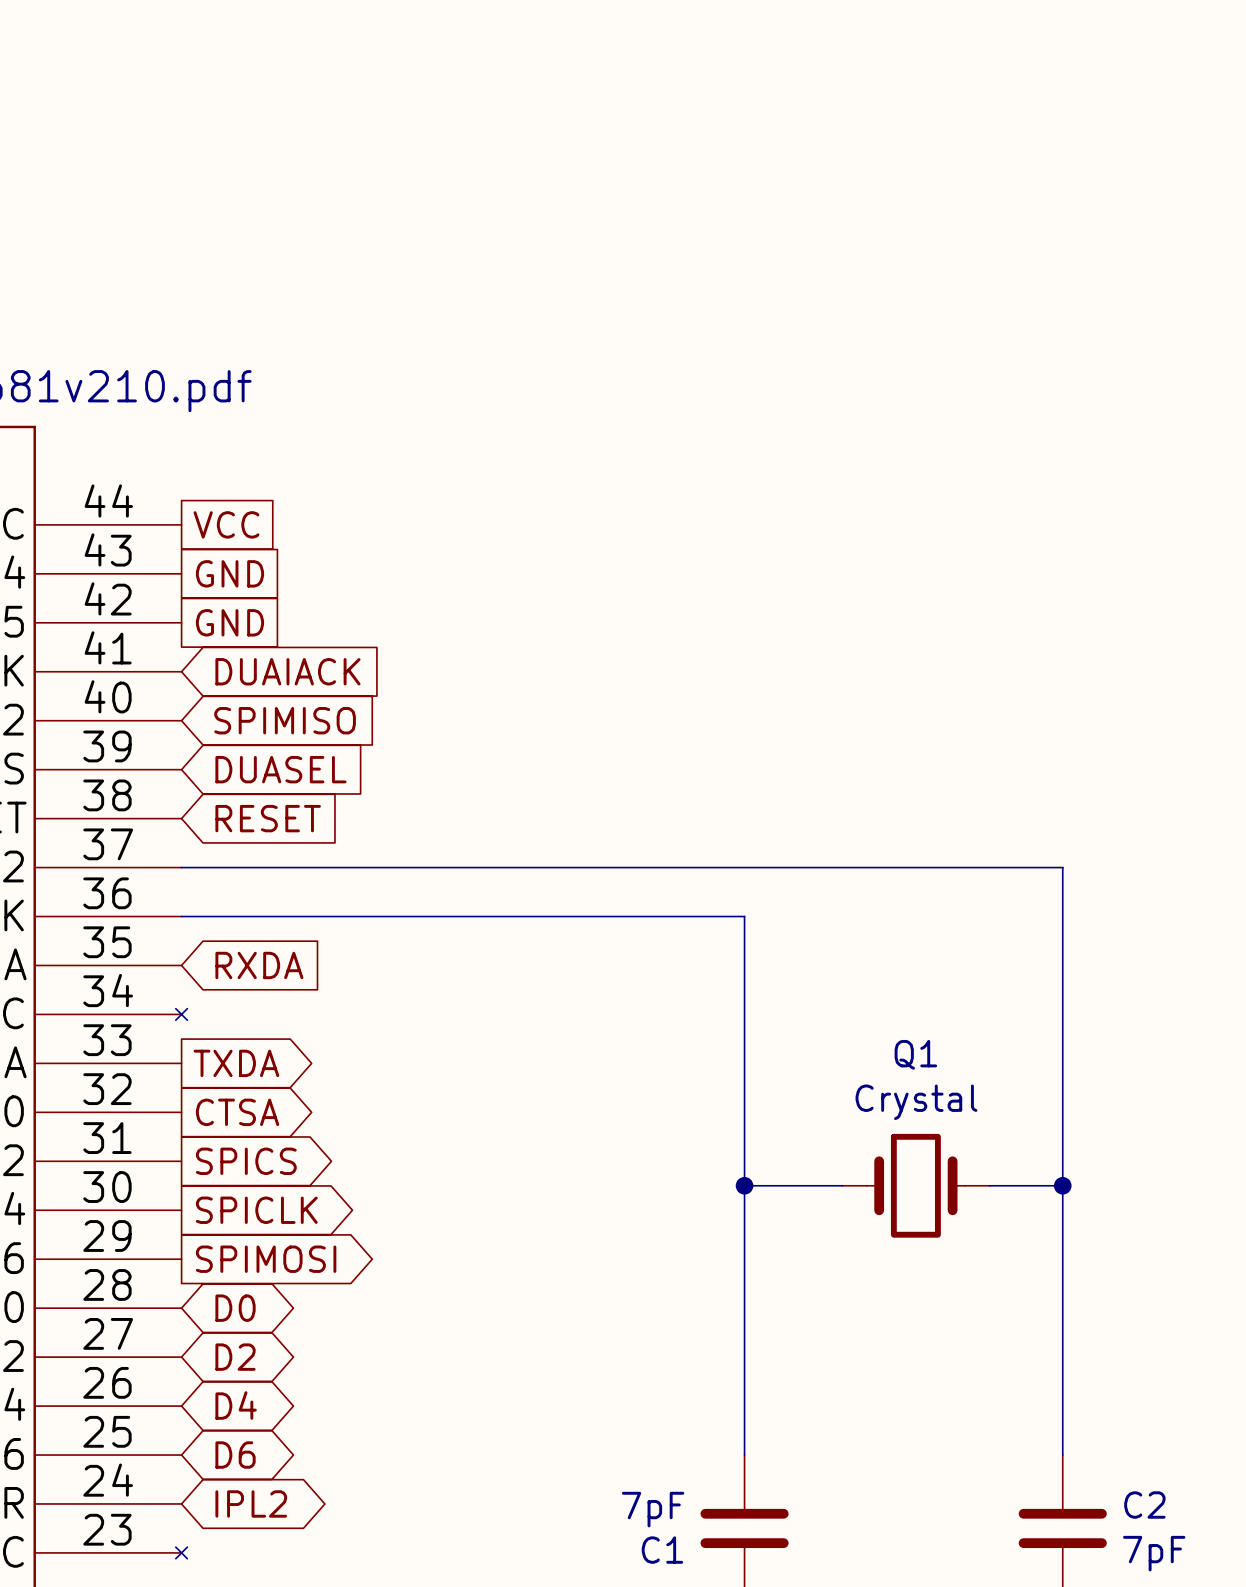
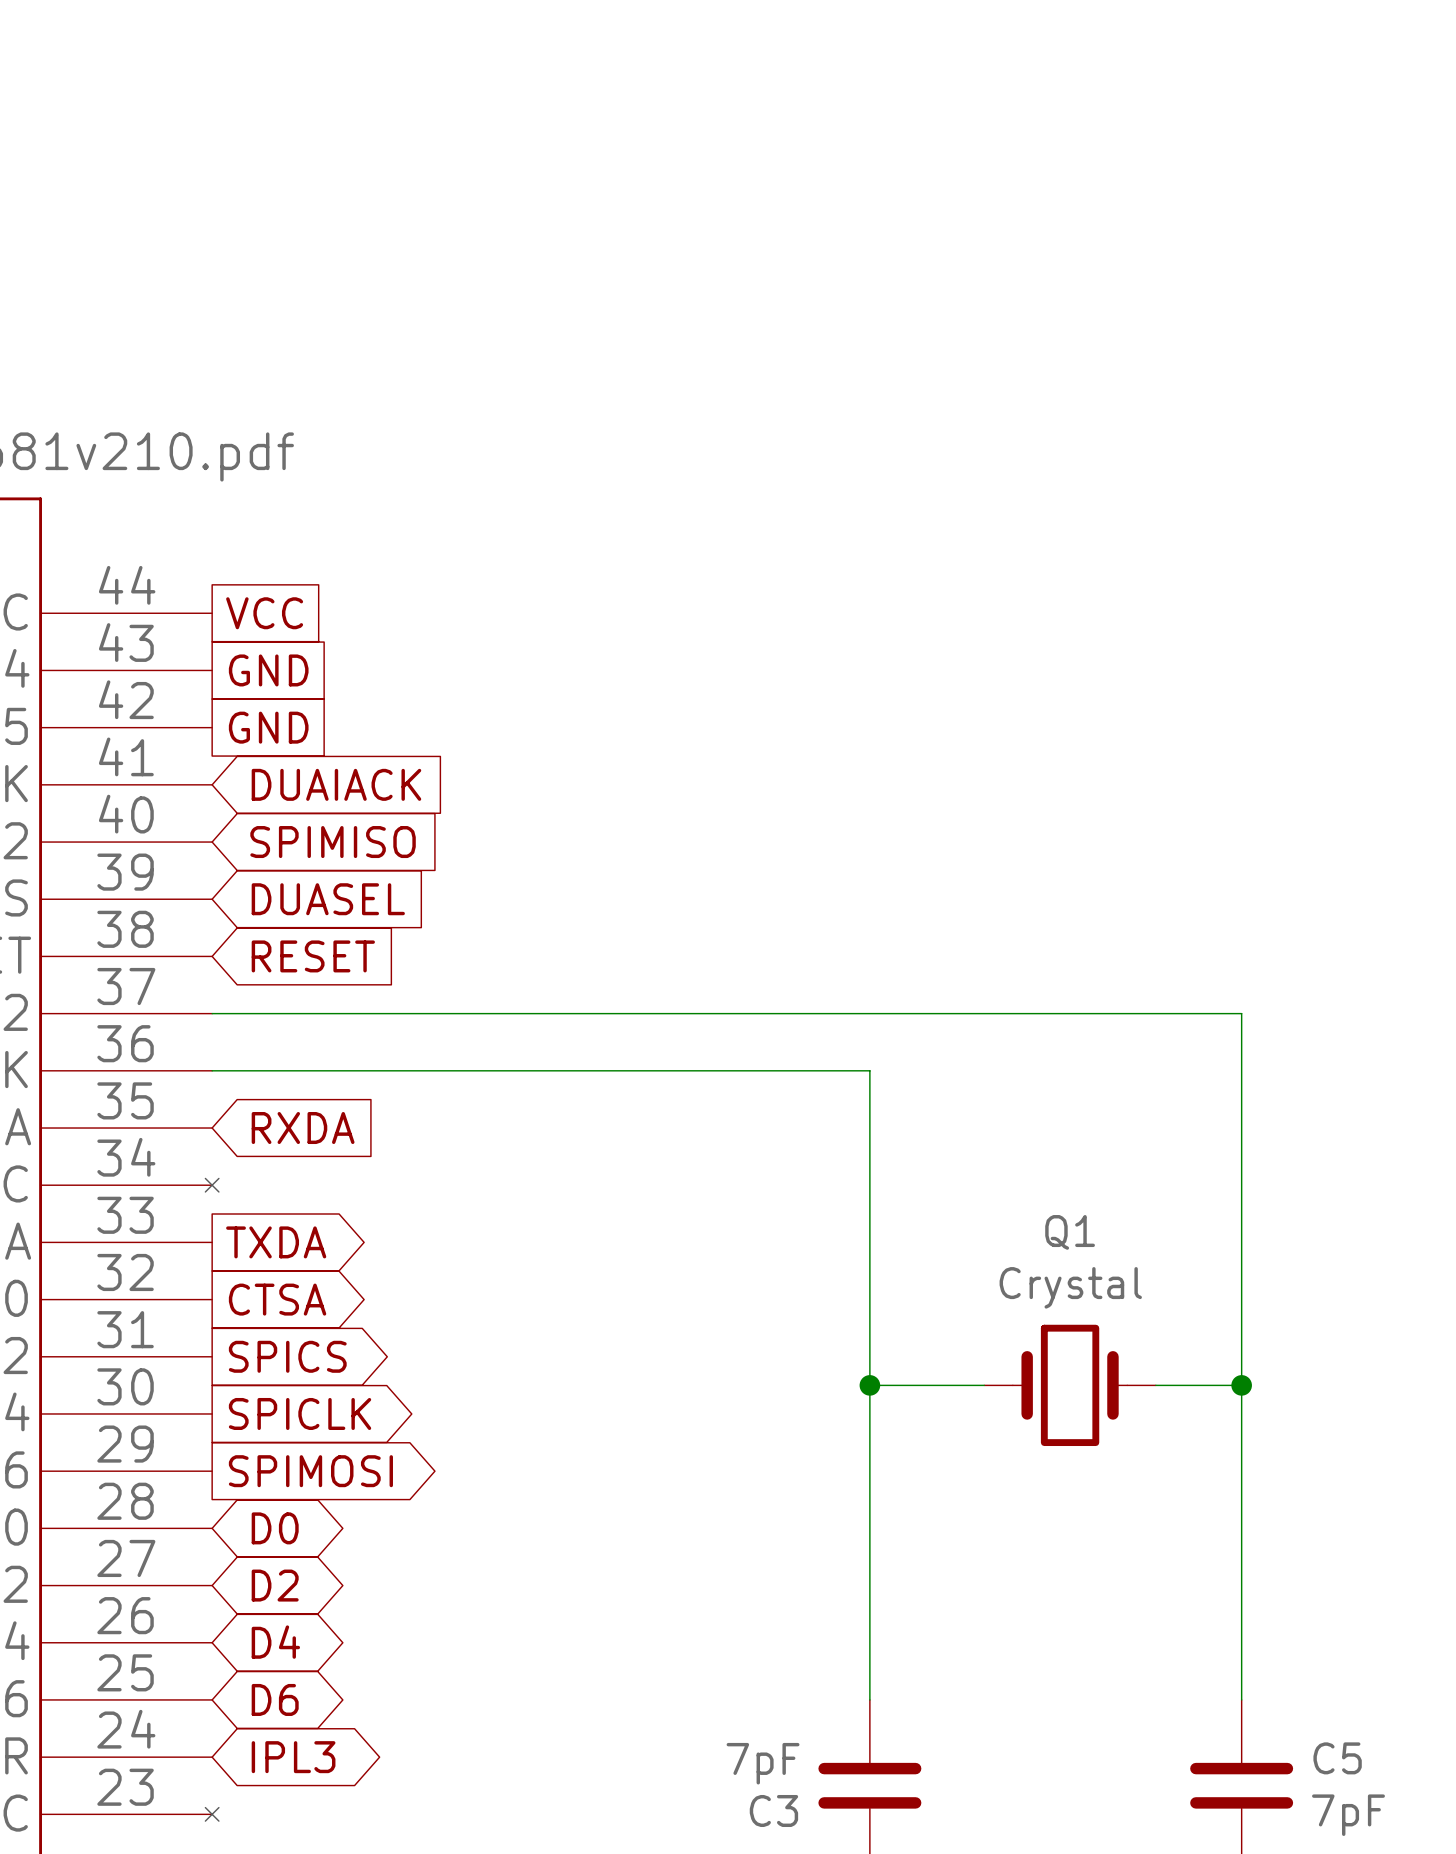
global label: IPL2 (251, 1503) -> IPL3 (293, 1757)
C2 name: C2 (1144, 1505) -> C5 (1337, 1758)
C1 name: C1 (662, 1550) -> C3 (773, 1810)

